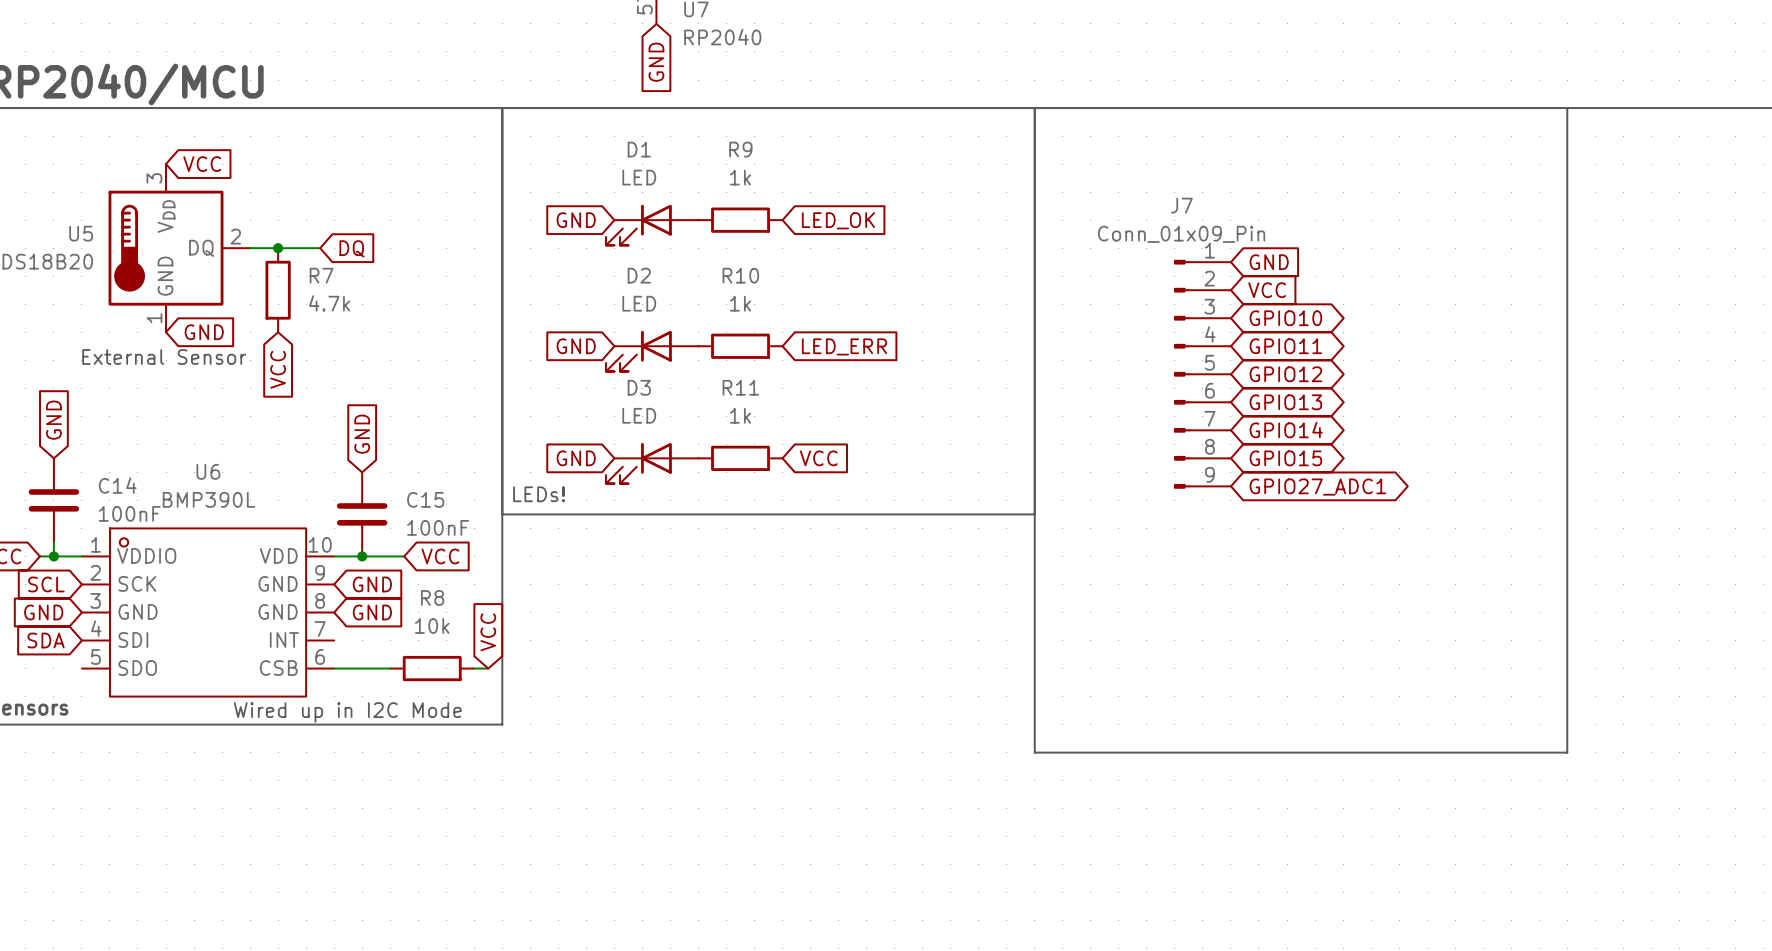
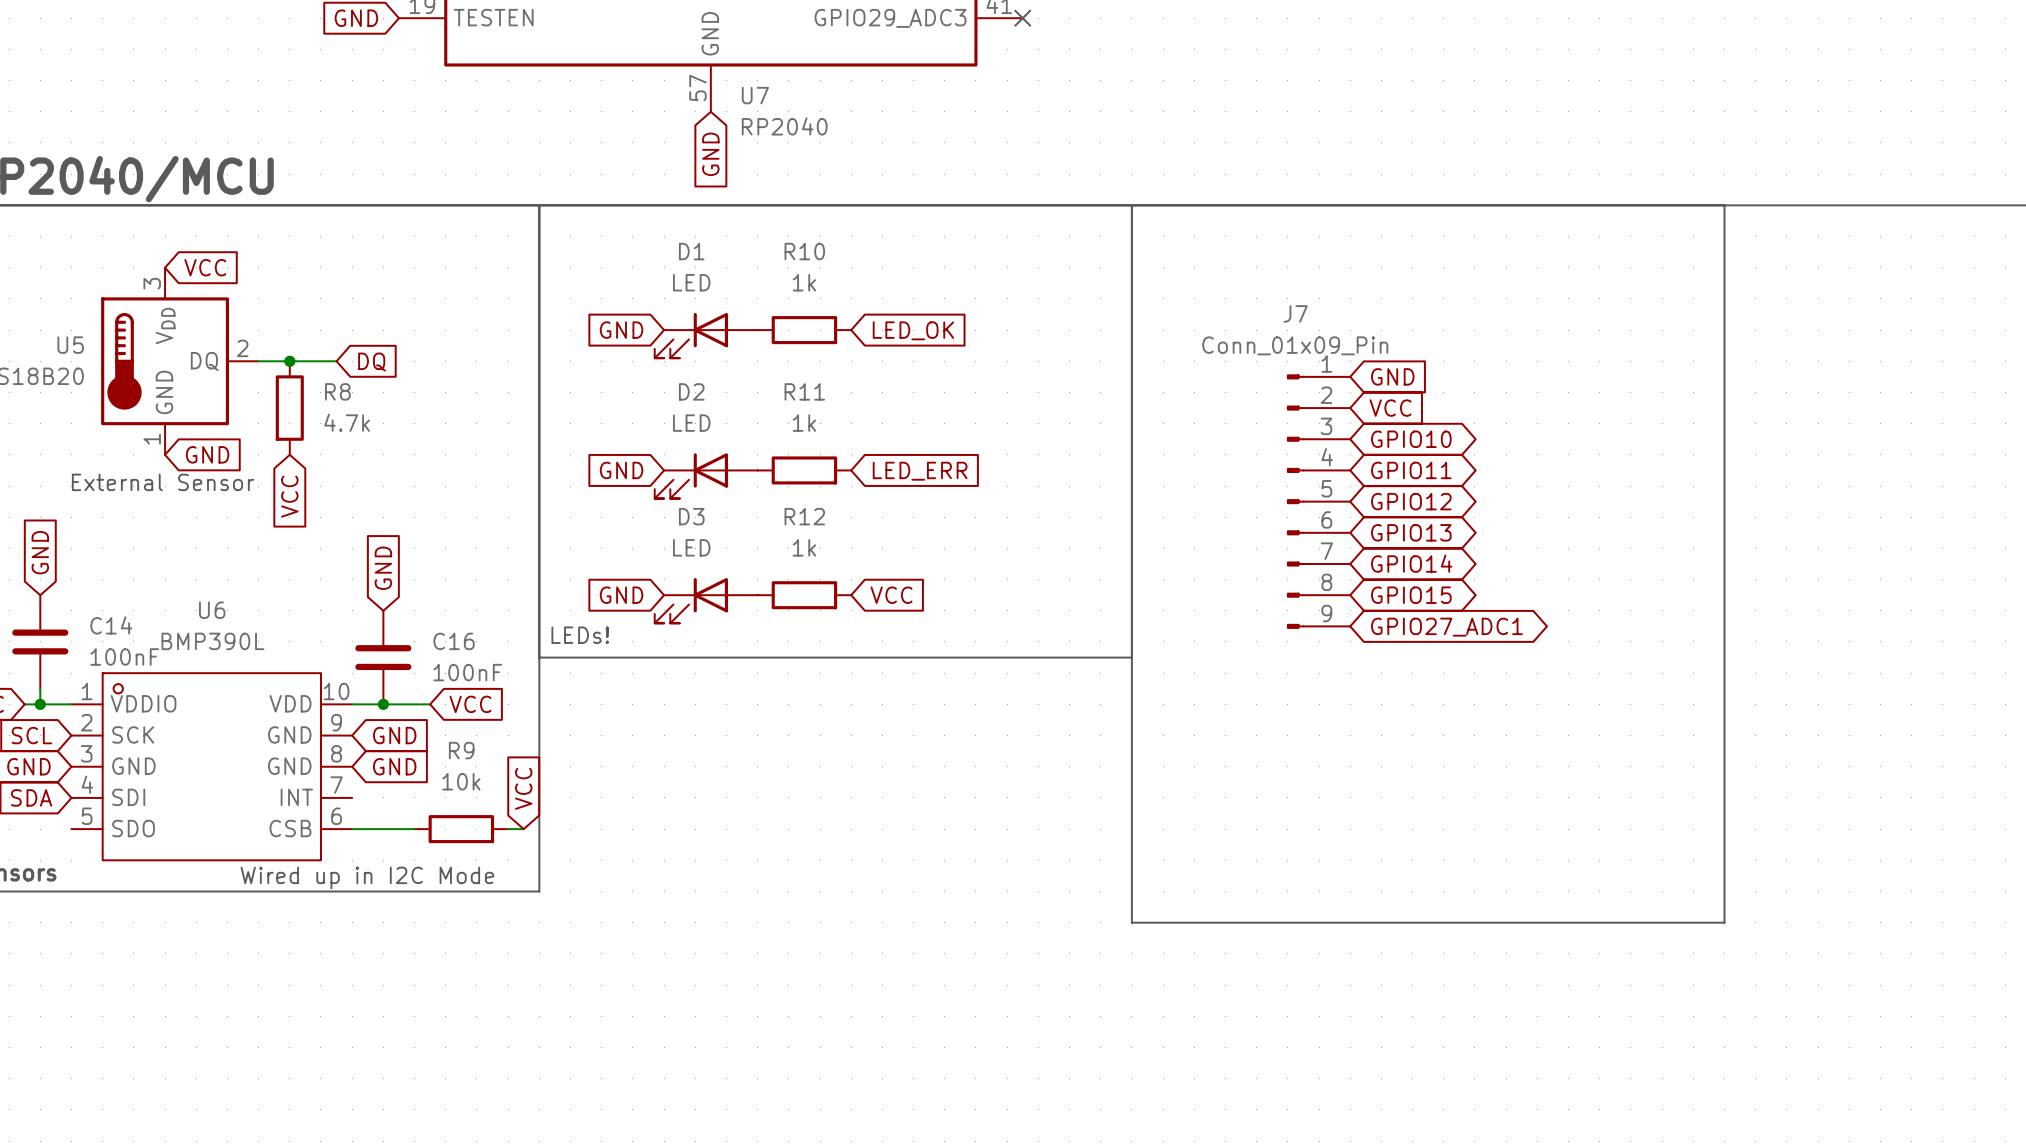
R9 name: R9 (740, 149) -> R10 (804, 251)
R7 name: R7 (321, 275) -> R8 (337, 391)
R10 name: R10 (740, 275) -> R11 (804, 391)
R11 name: R11 (740, 387) -> R12 (804, 516)
C15 name: C15 (425, 499) -> C16 (454, 641)
R8 name: R8 (432, 597) -> R9 (461, 750)

